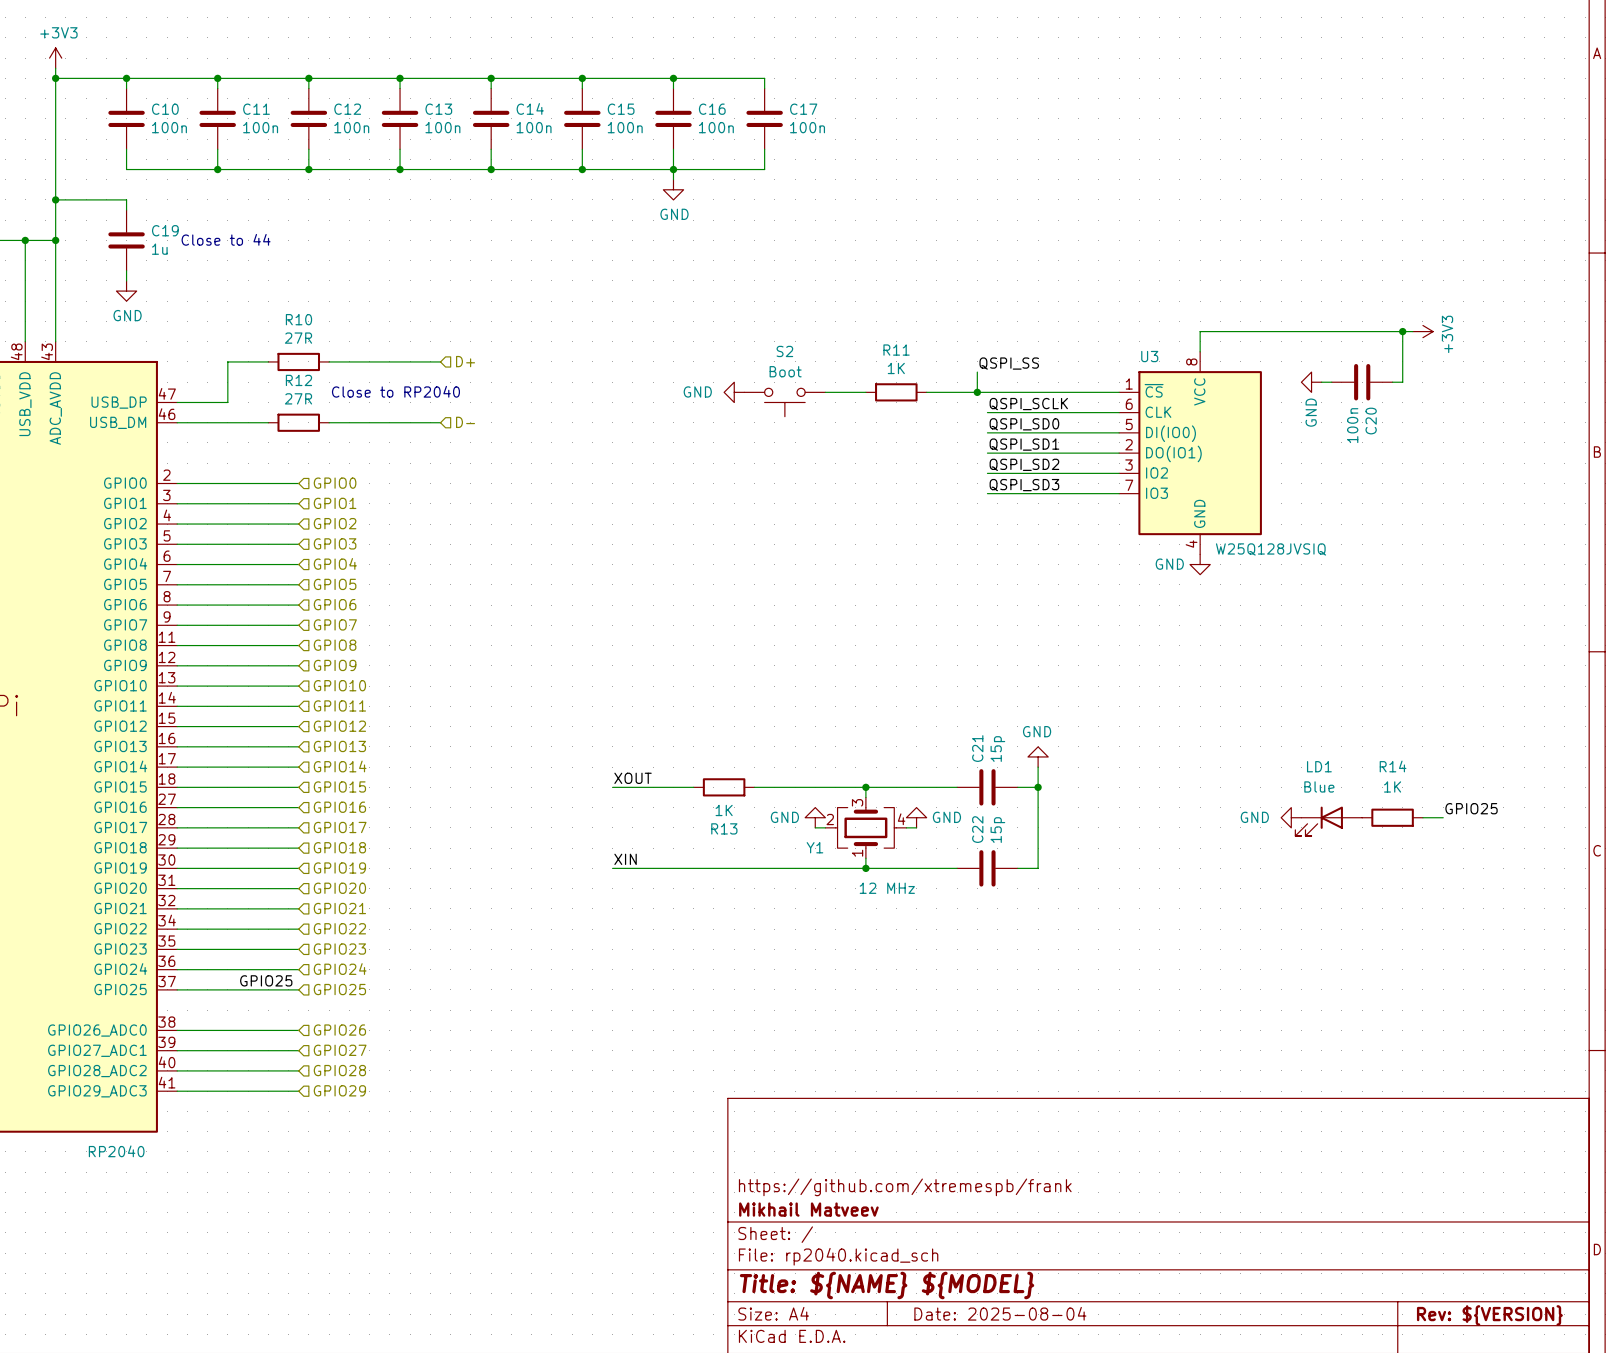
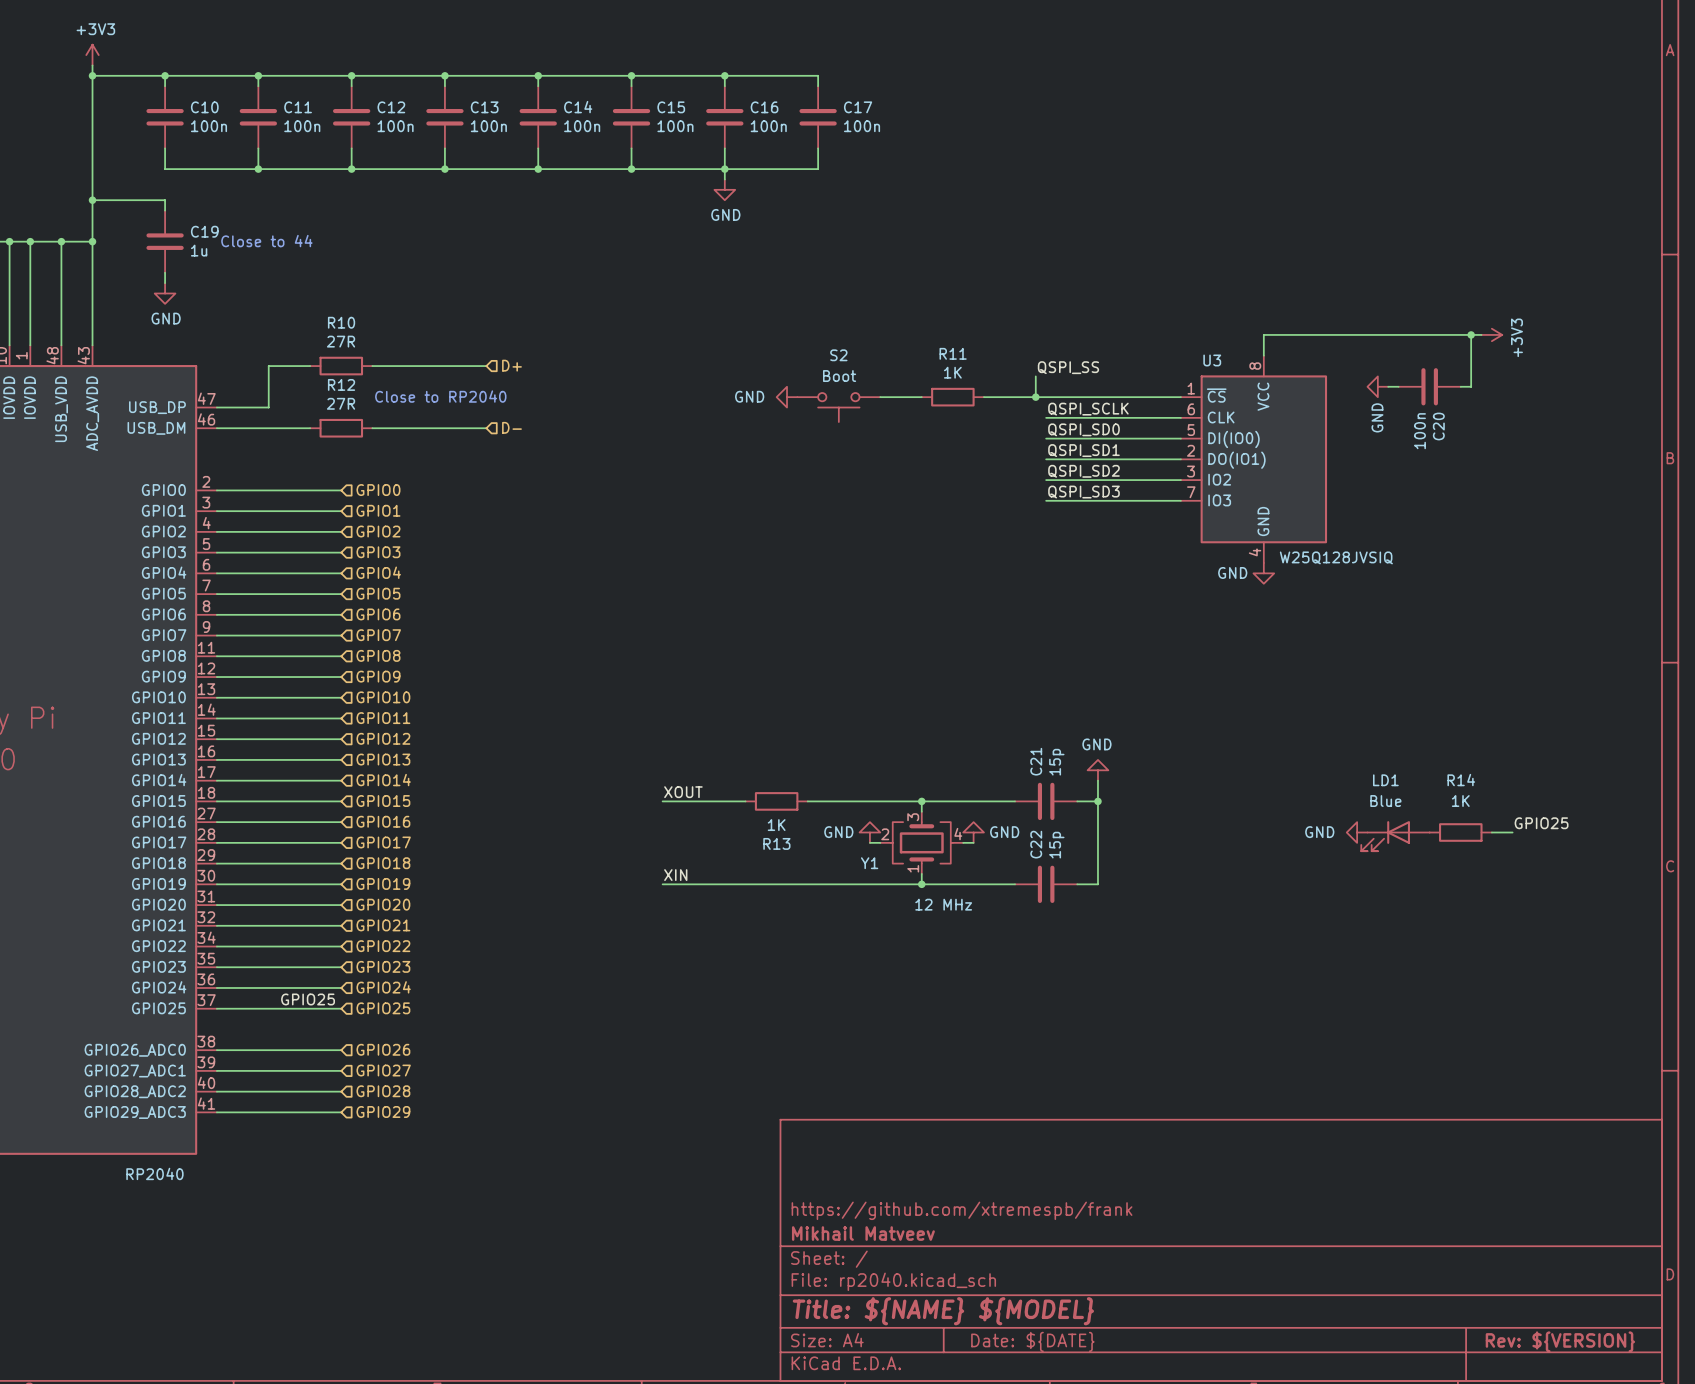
title block: Date: 2025-08-04 (1000, 1313) -> Date: ${DATE} (1032, 1341)

